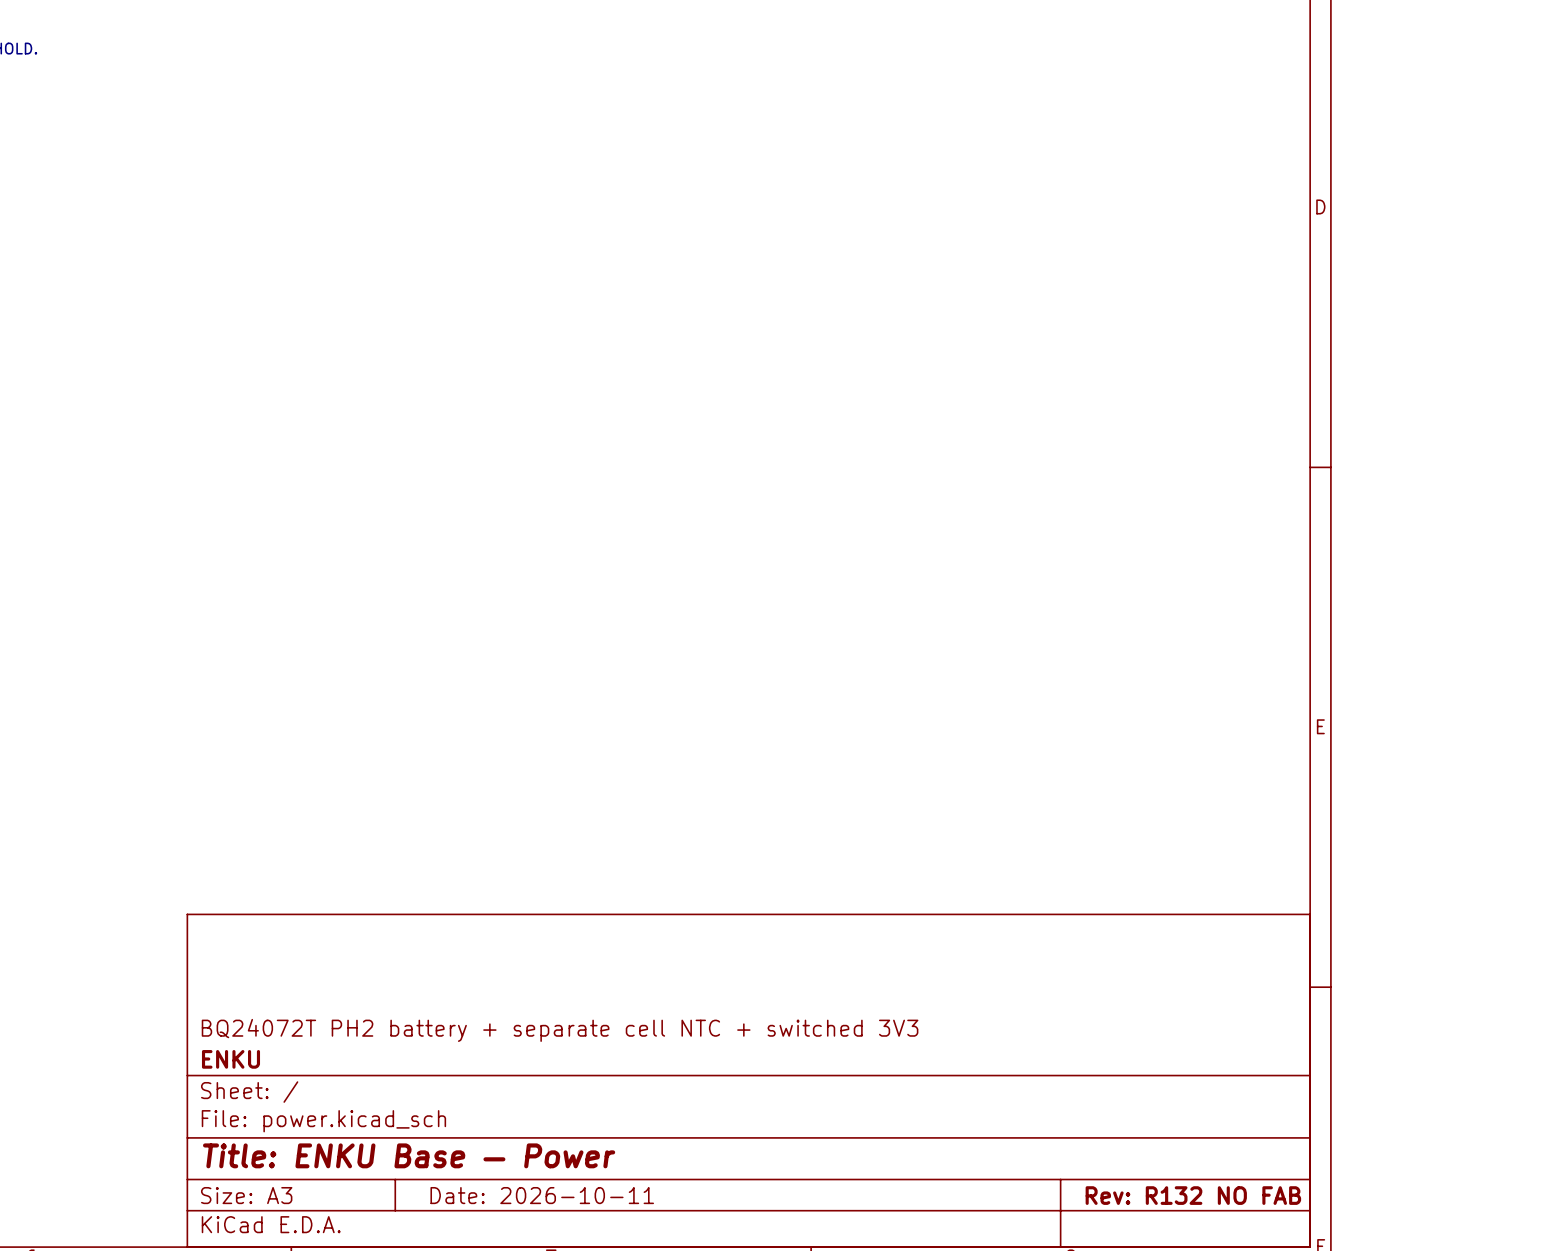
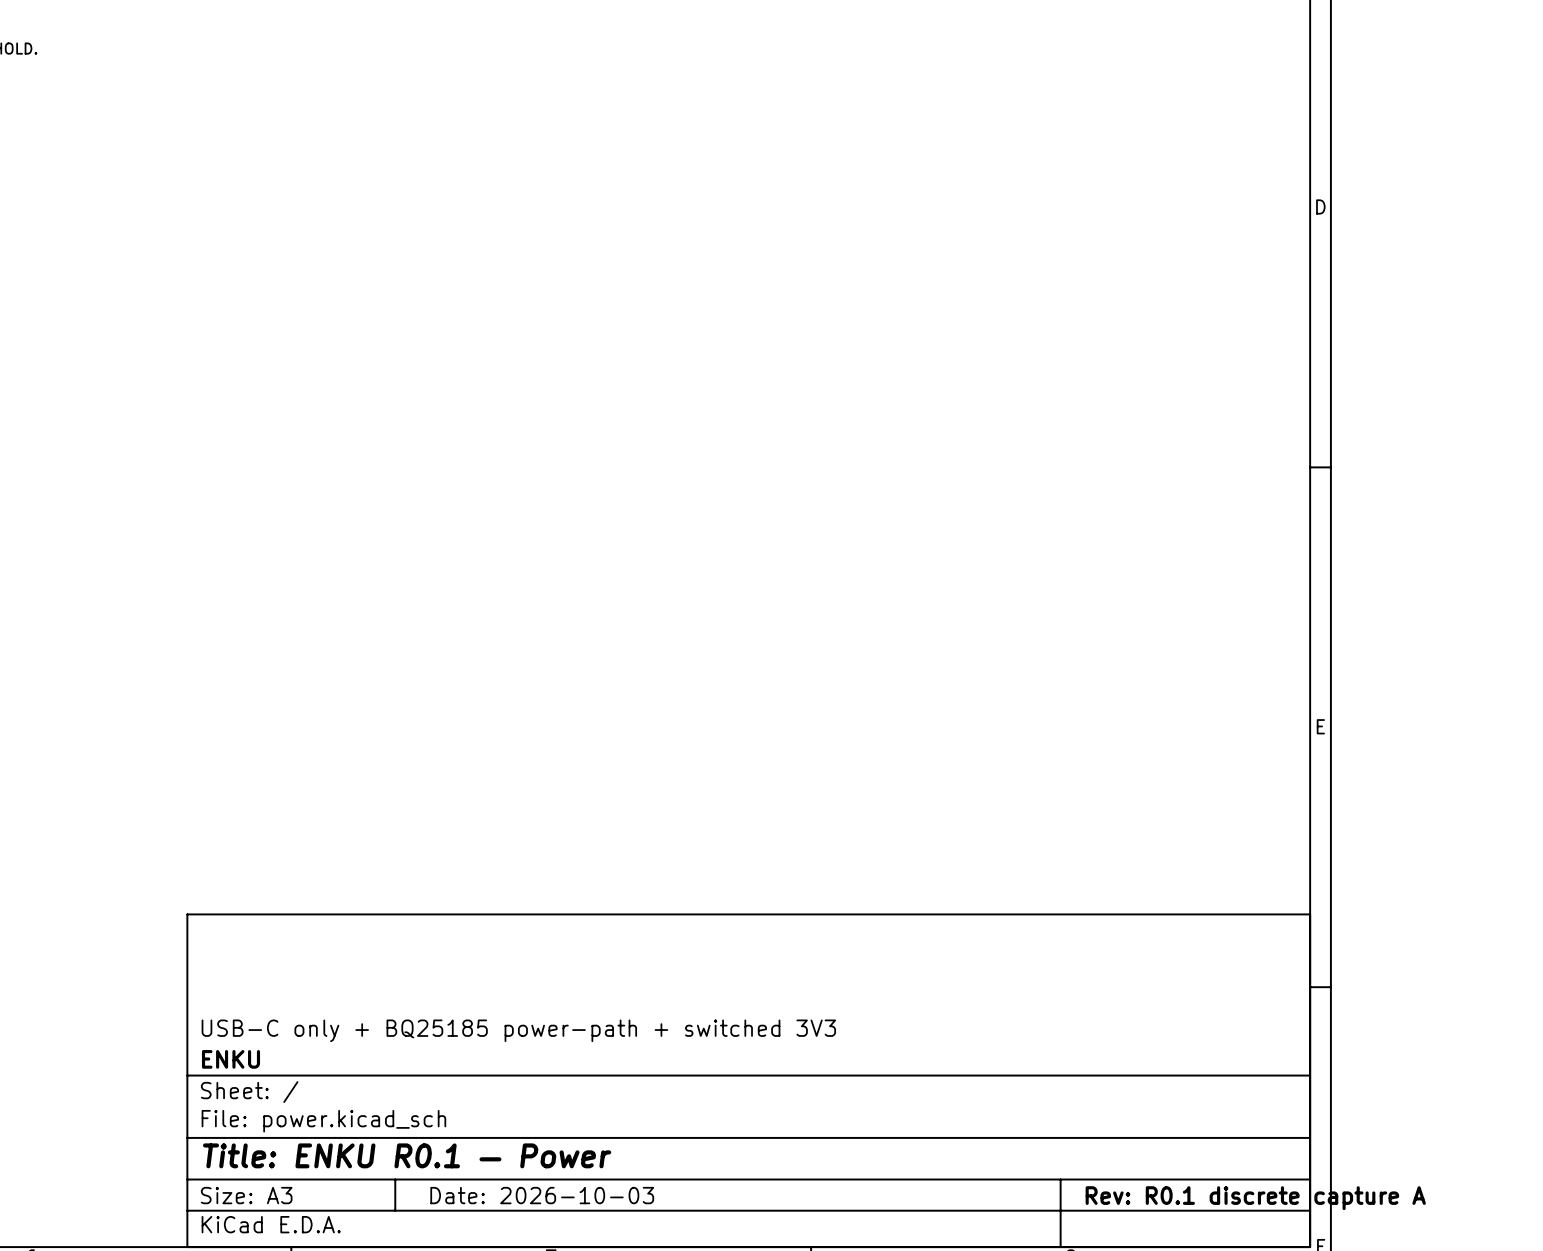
title block: BQ24072T PH2 battery + separate cell NTC + switched 3V3 (560, 1030) -> USB-C only + BQ25185 power-path + switched 3V3 (518, 1030)
title block: Title: ENKU Base — Power (409, 1155) -> Title: ENKU R0.1 — Power (407, 1155)
title block: Date: 2026-10-11 (542, 1195) -> Date: 2026-10-03 (542, 1195)
title block: Rev: R132 NO FAB (1193, 1195) -> Rev: R0.1 discrete capture A (1255, 1198)

